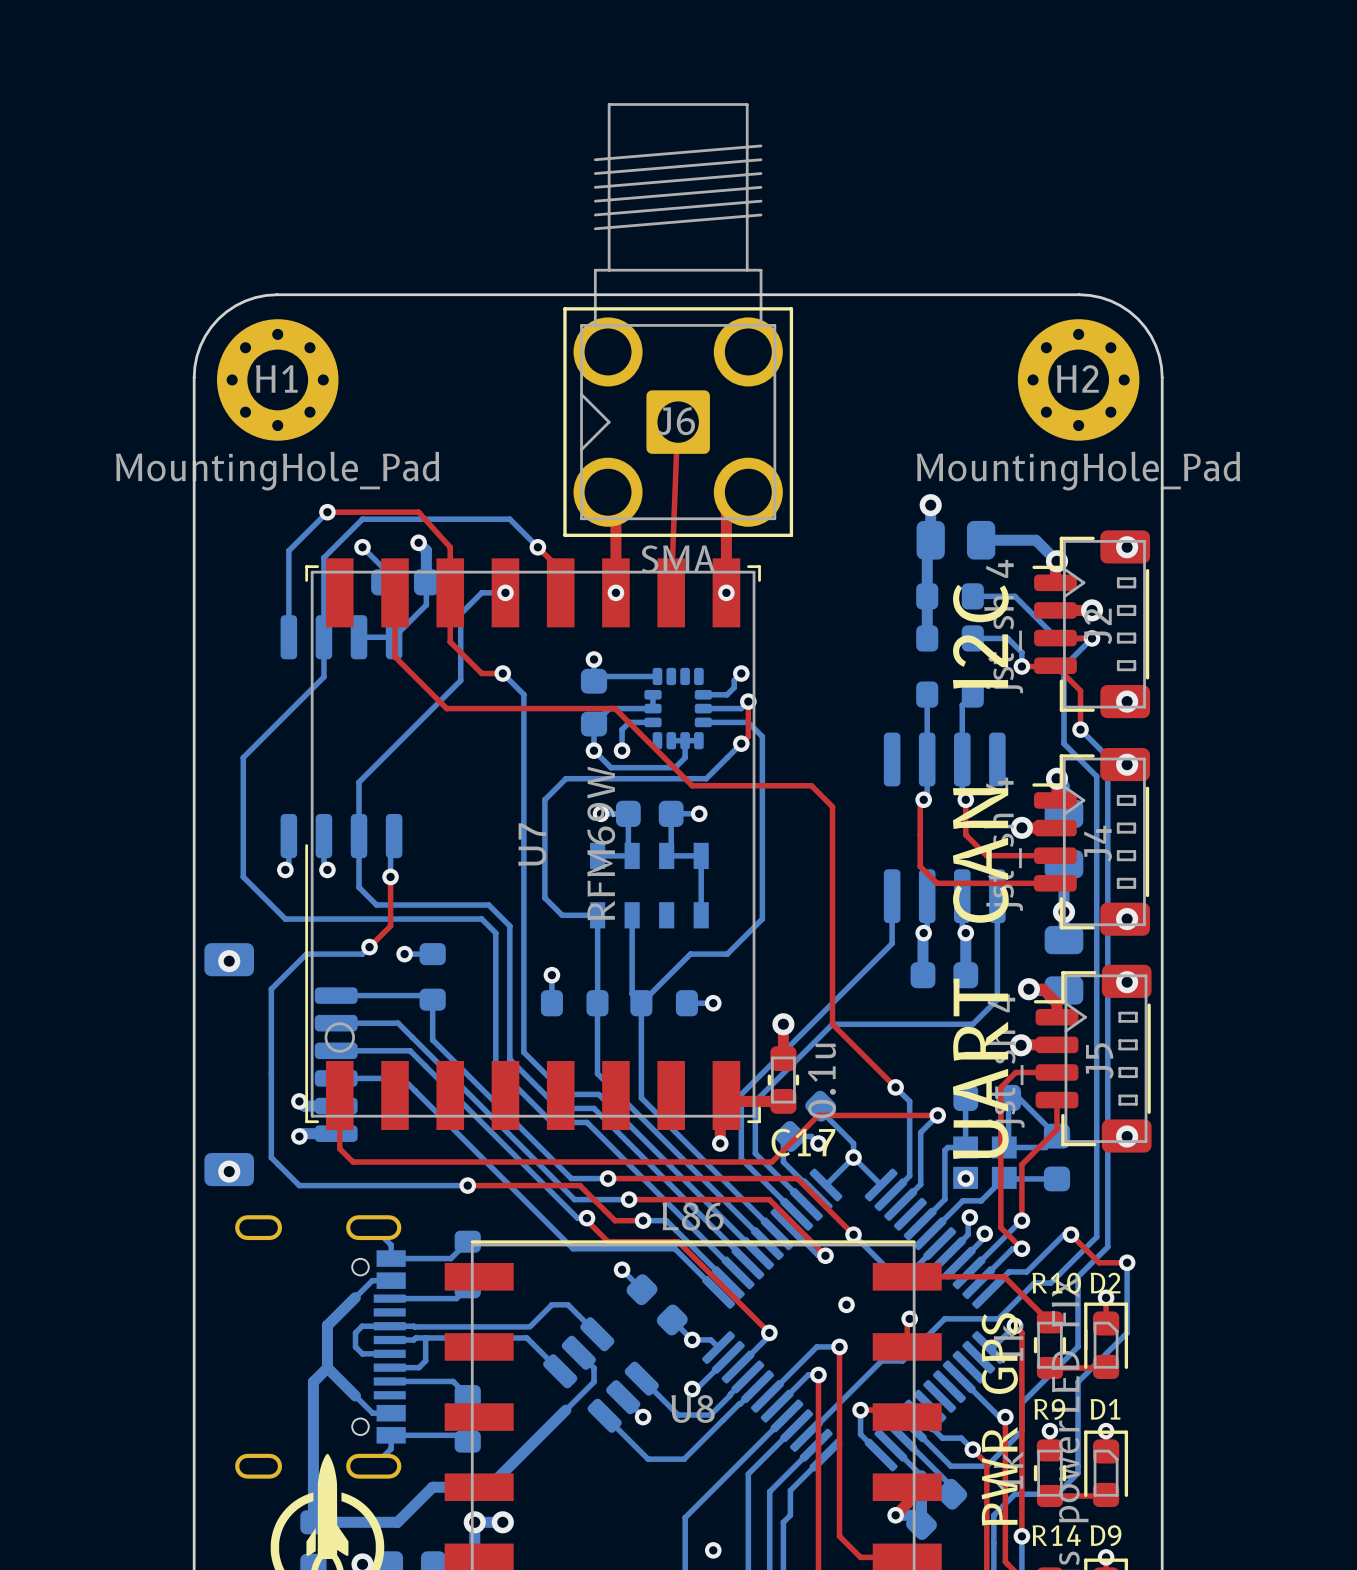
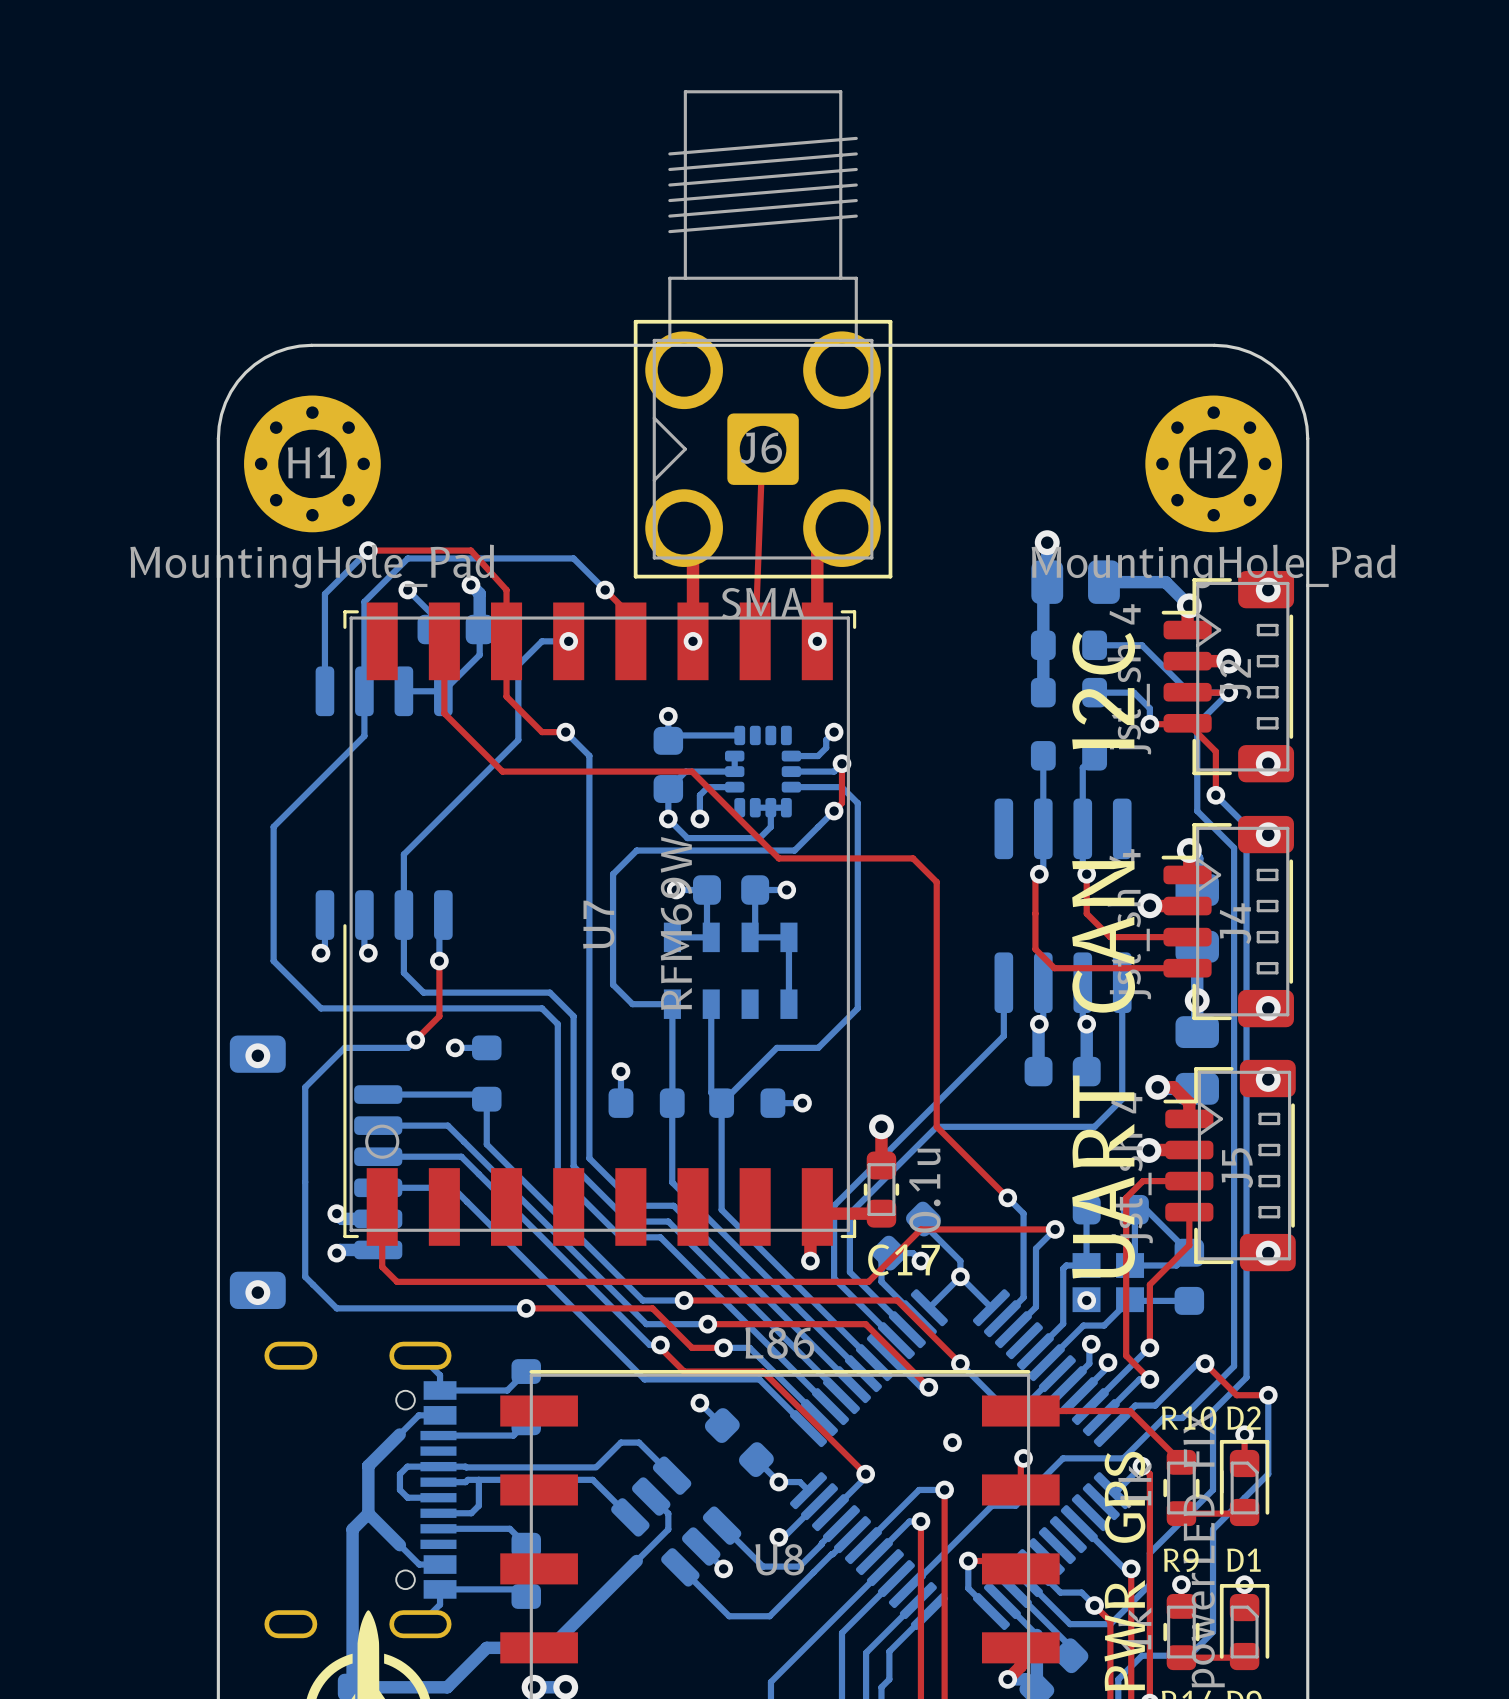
H1 position: (277, 379) -> (312, 463)
H2 position: (1078, 379) -> (1213, 463)
board edge: (194, 412) (194, 377) (196, 356) (211, 327) (226, 311) (245, 301) (277, 294) (1090, 295) (1120, 305) (1137, 318) (1151, 336) (1161, 366) (1162, 412) -> (218, 438) (221, 414) (225, 402) (237, 381) (245, 372) (264, 357) (275, 352) (287, 348) (311, 345) (1226, 346) (1238, 348) (1261, 357) (1280, 372) (1288, 381) (1300, 402) (1304, 414) (1307, 438)

